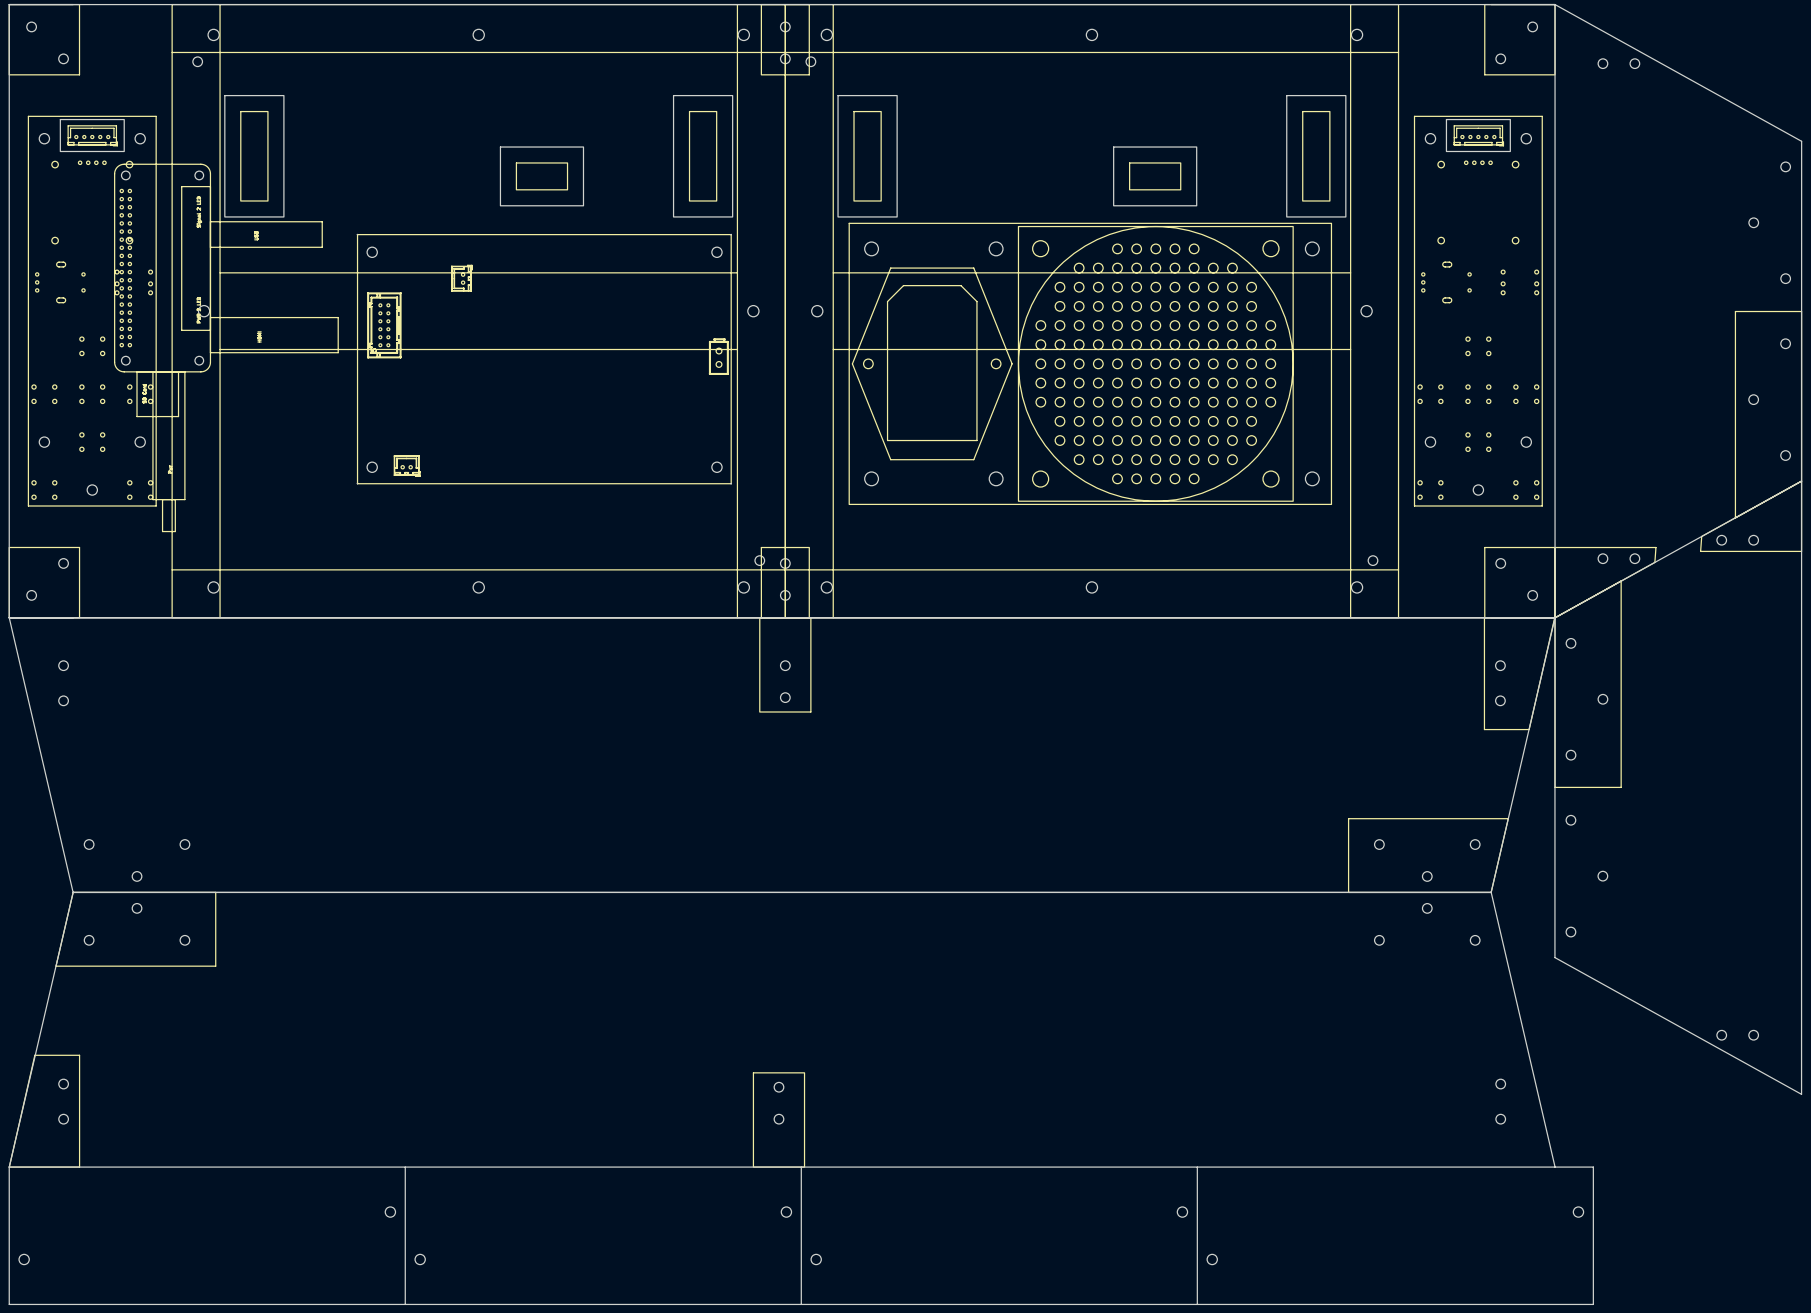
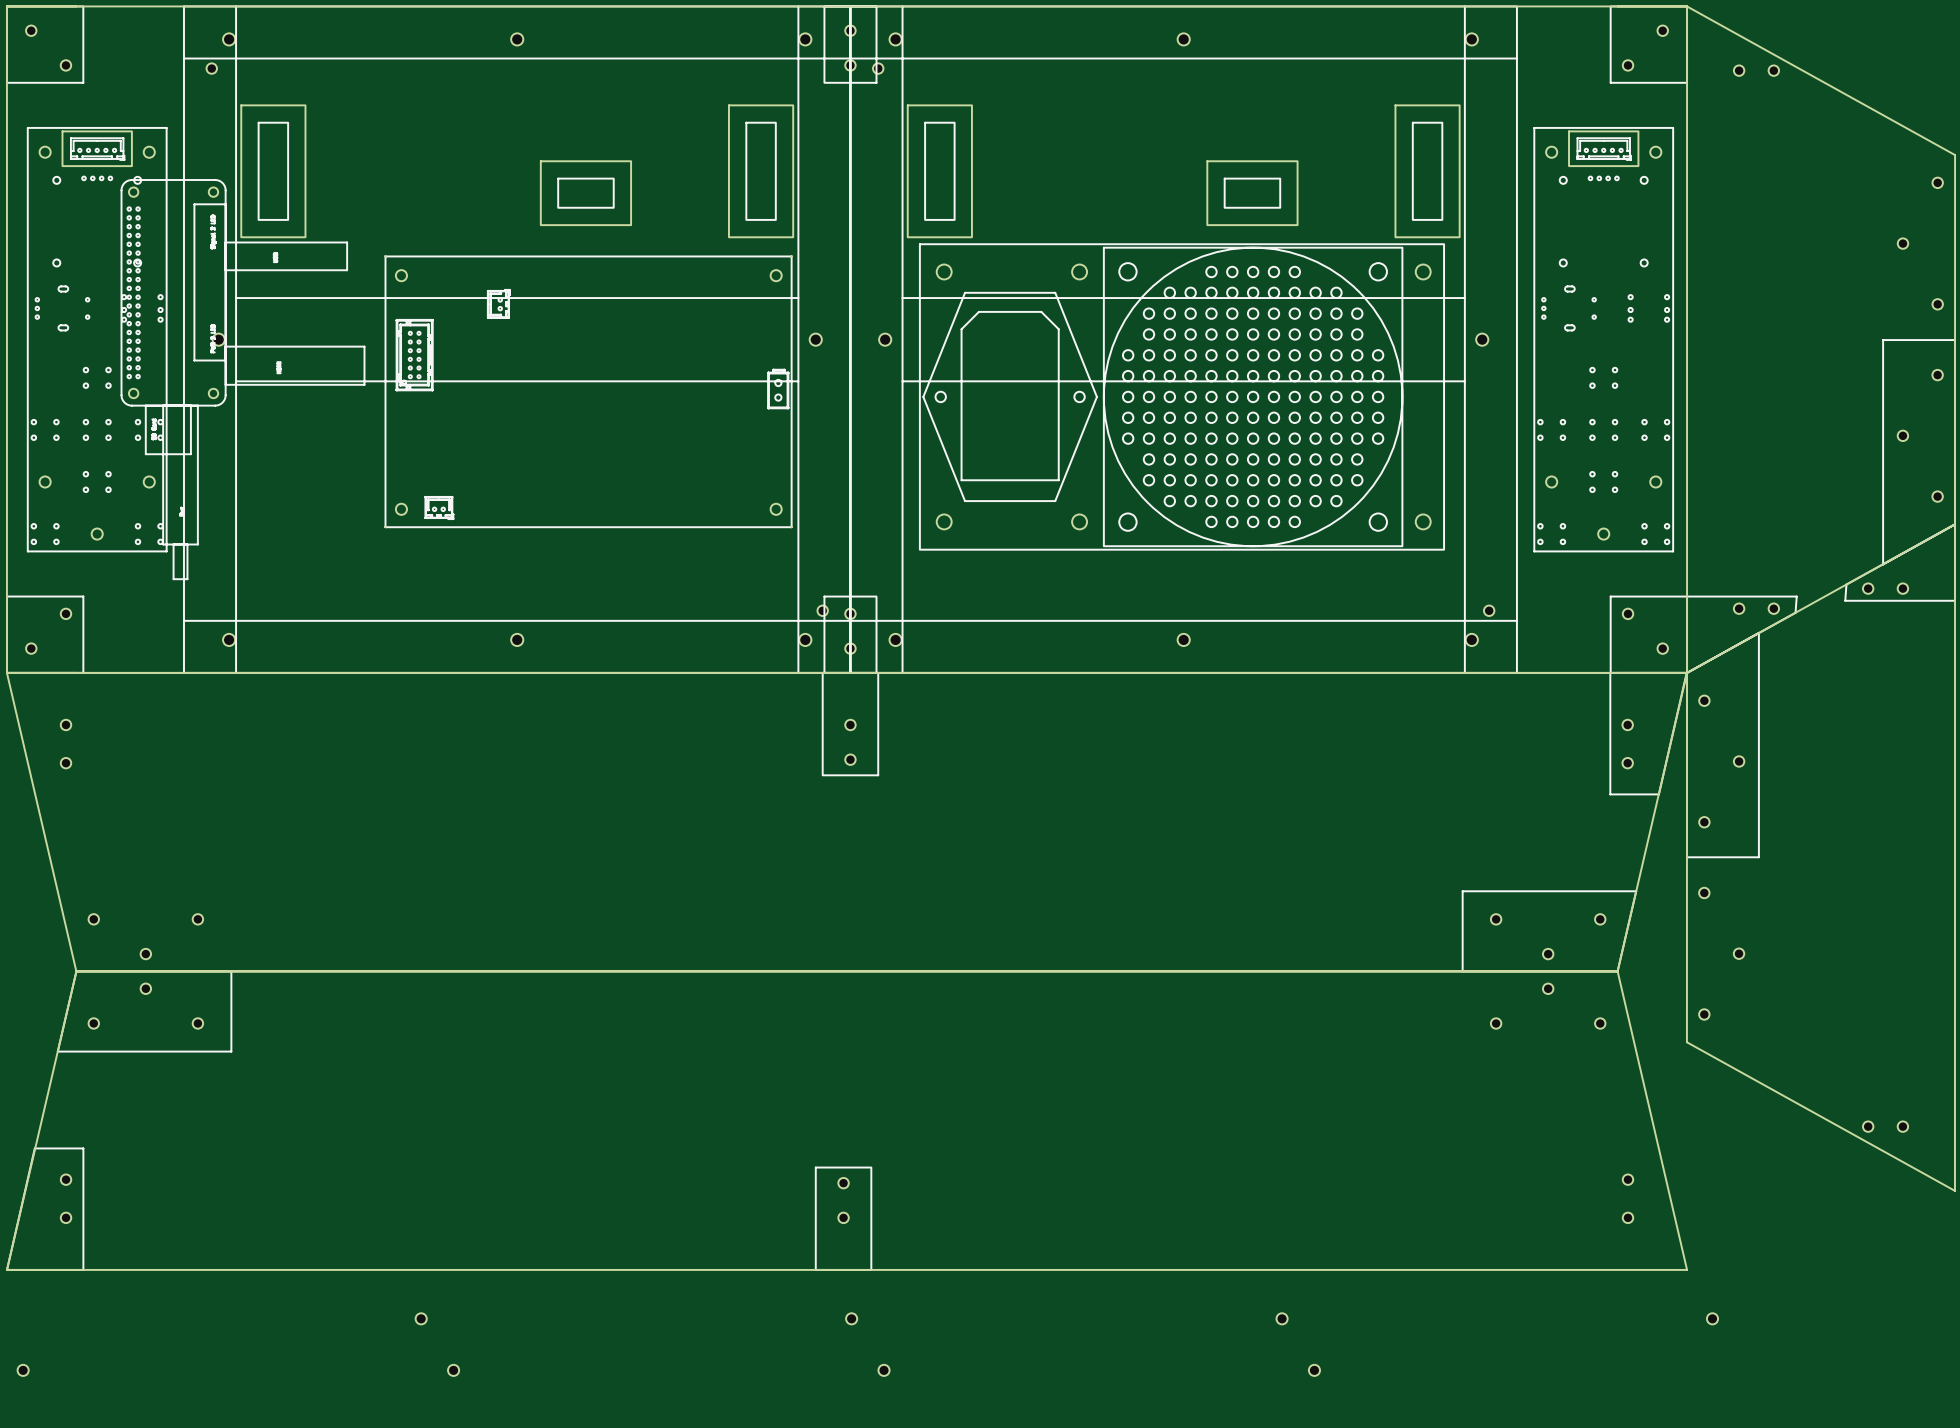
board edge: (9, 1167) (9, 1304) (1593, 1304) (1593, 1167) -> none
board edge: (405, 1167) (405, 1304) -> none
board edge: (801, 1167) (801, 1304) -> none
board edge: (1197, 1167) (1197, 1304) -> none
board edge: (1555, 1167) (1593, 1167) -> none

